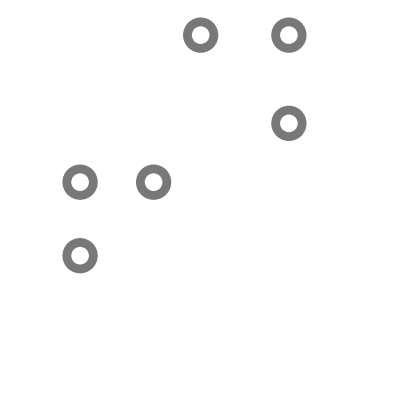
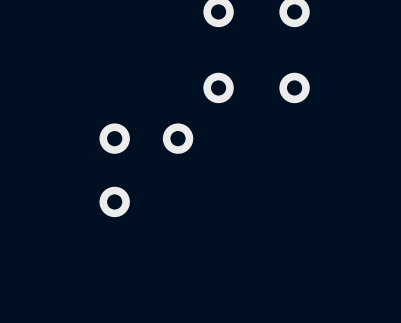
via: none -> (218, 87)

